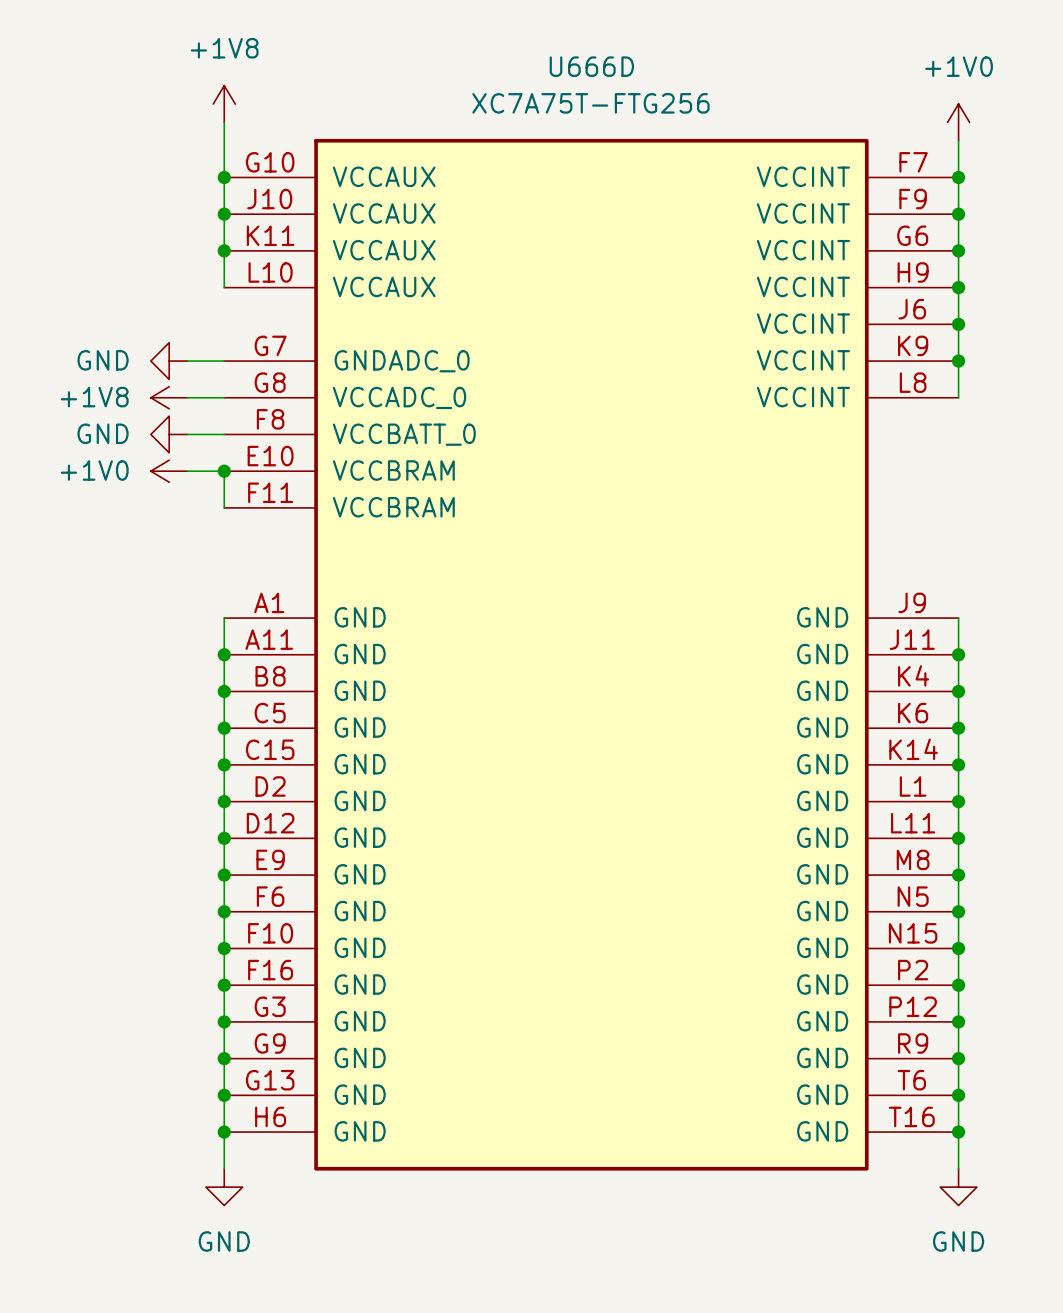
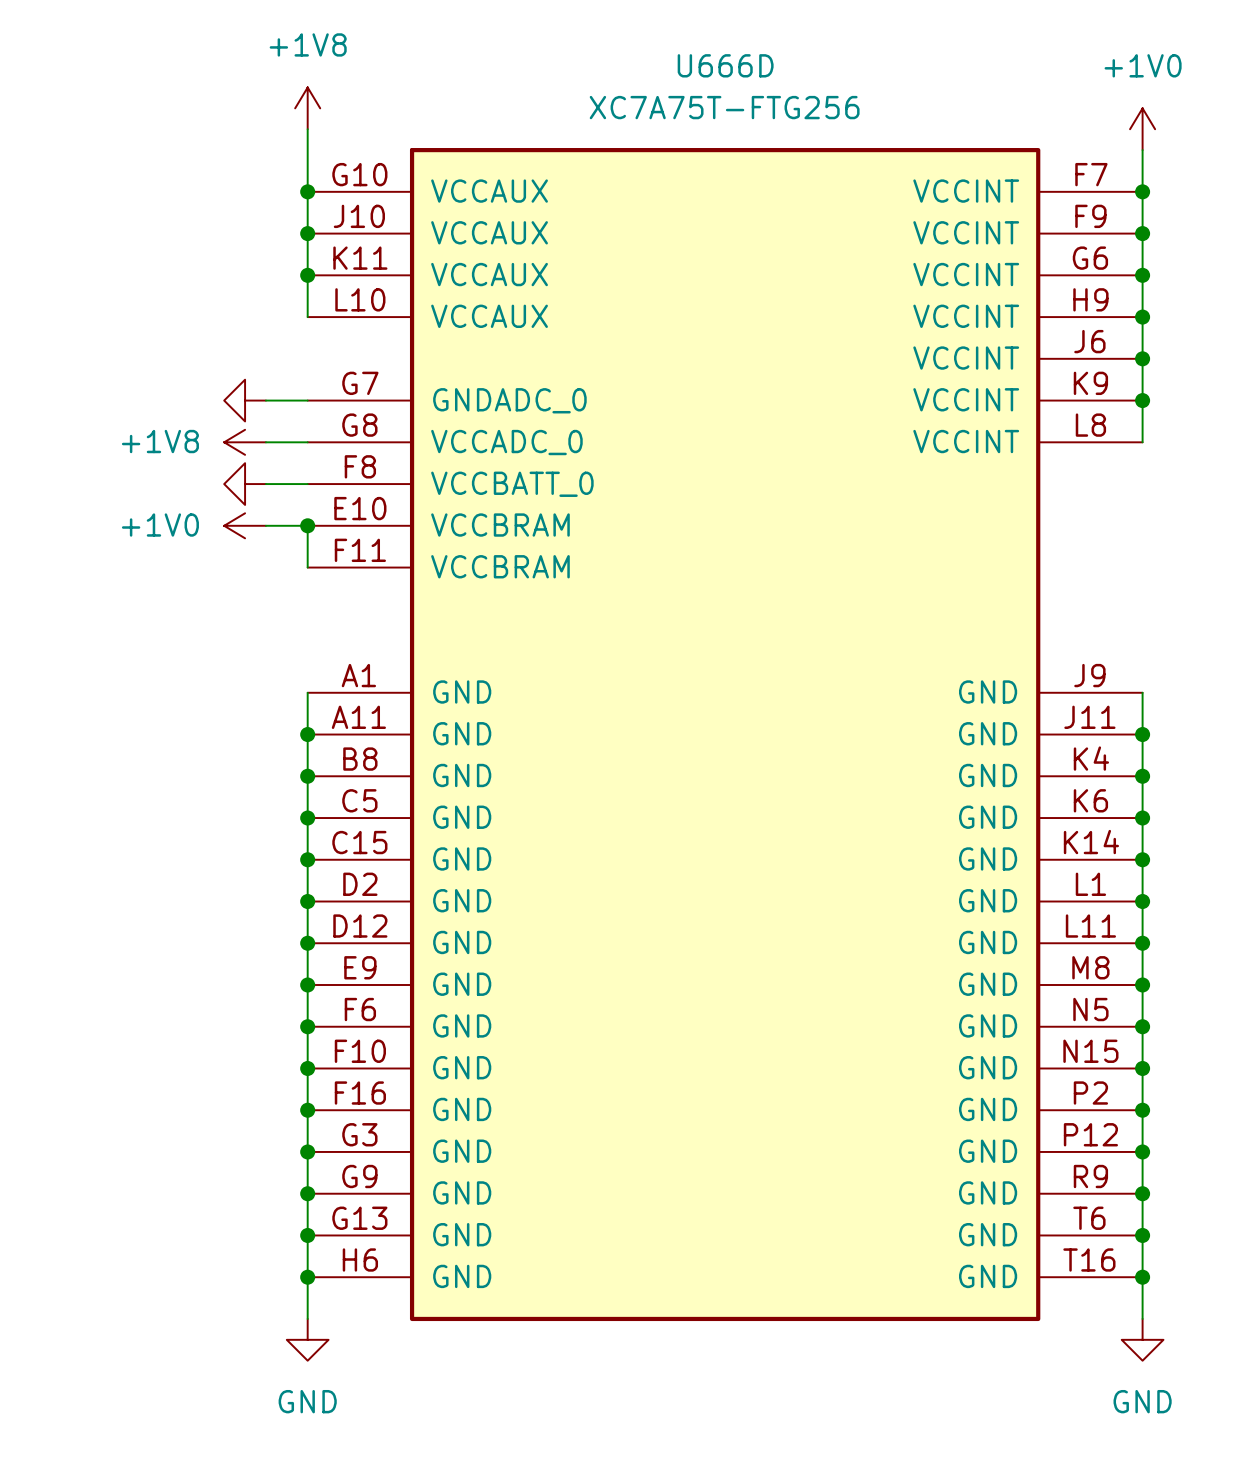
power symbol text: GND (103, 360) -> none
power symbol text: GND (103, 433) -> none

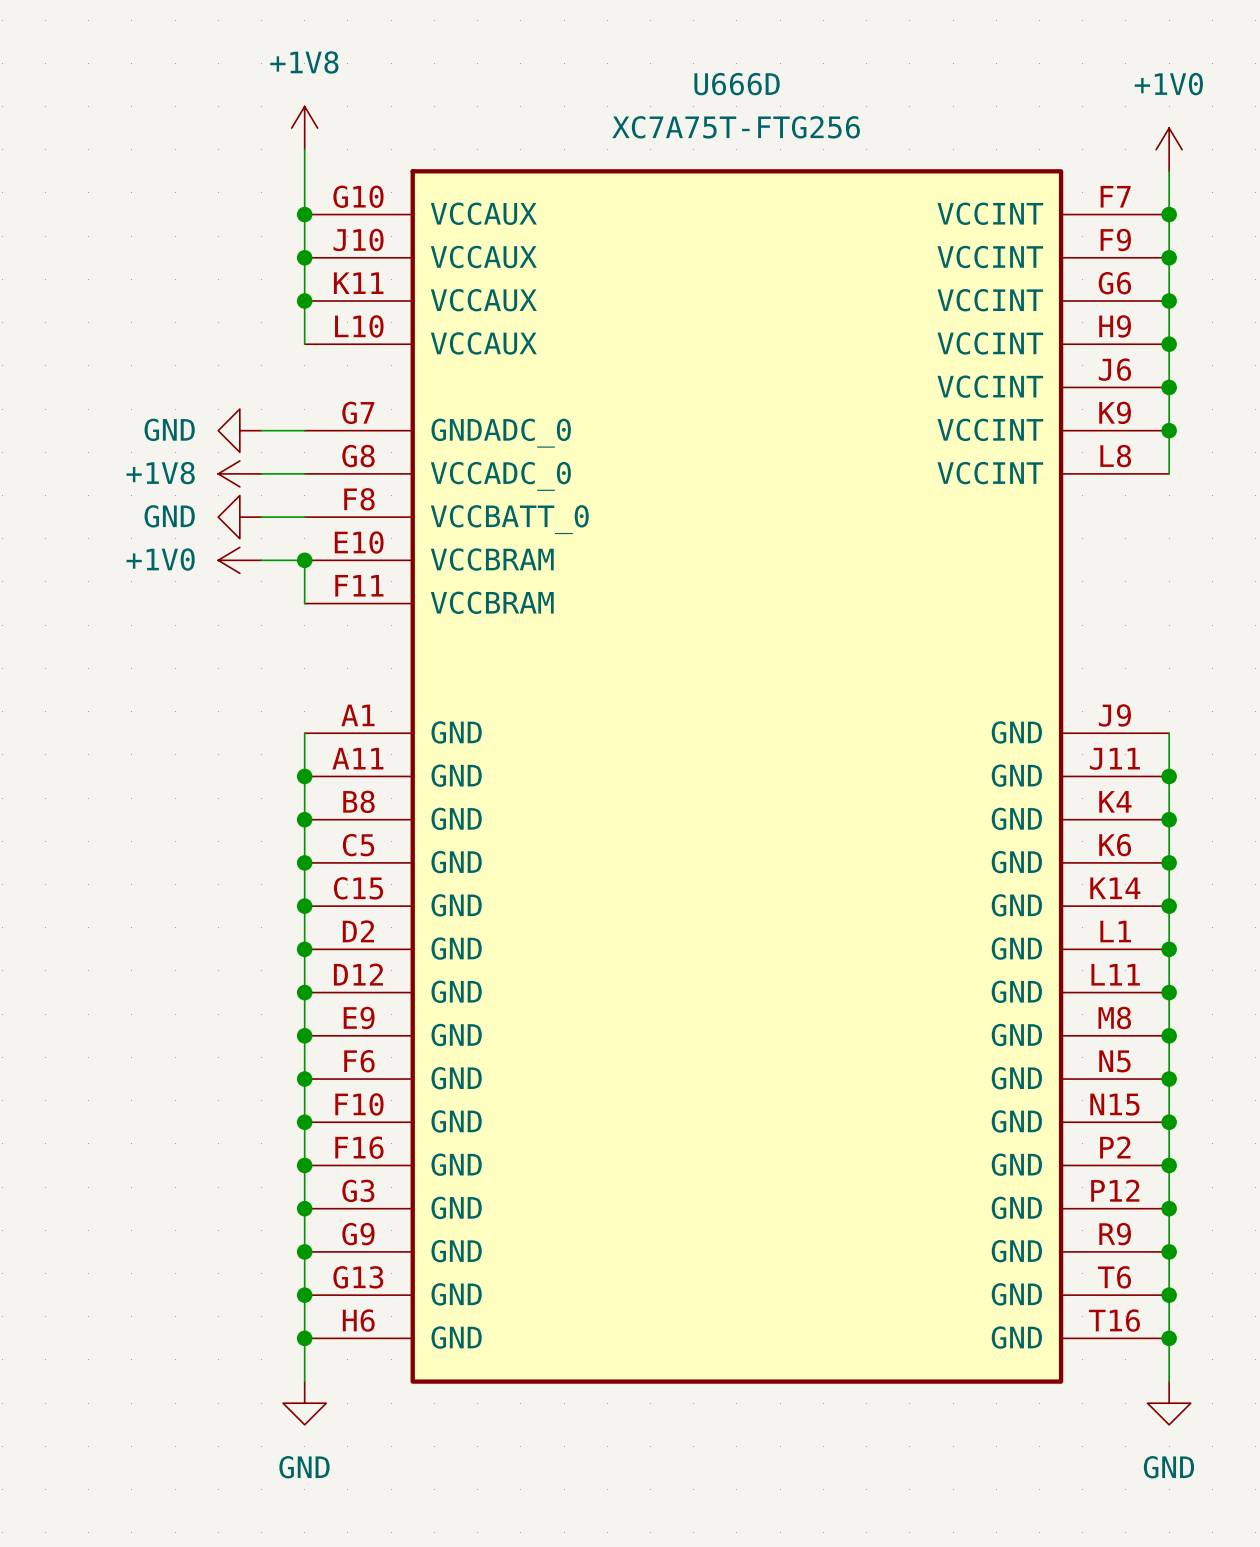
power symbol text: none -> GND (169, 429)
power symbol text: none -> GND (169, 516)

